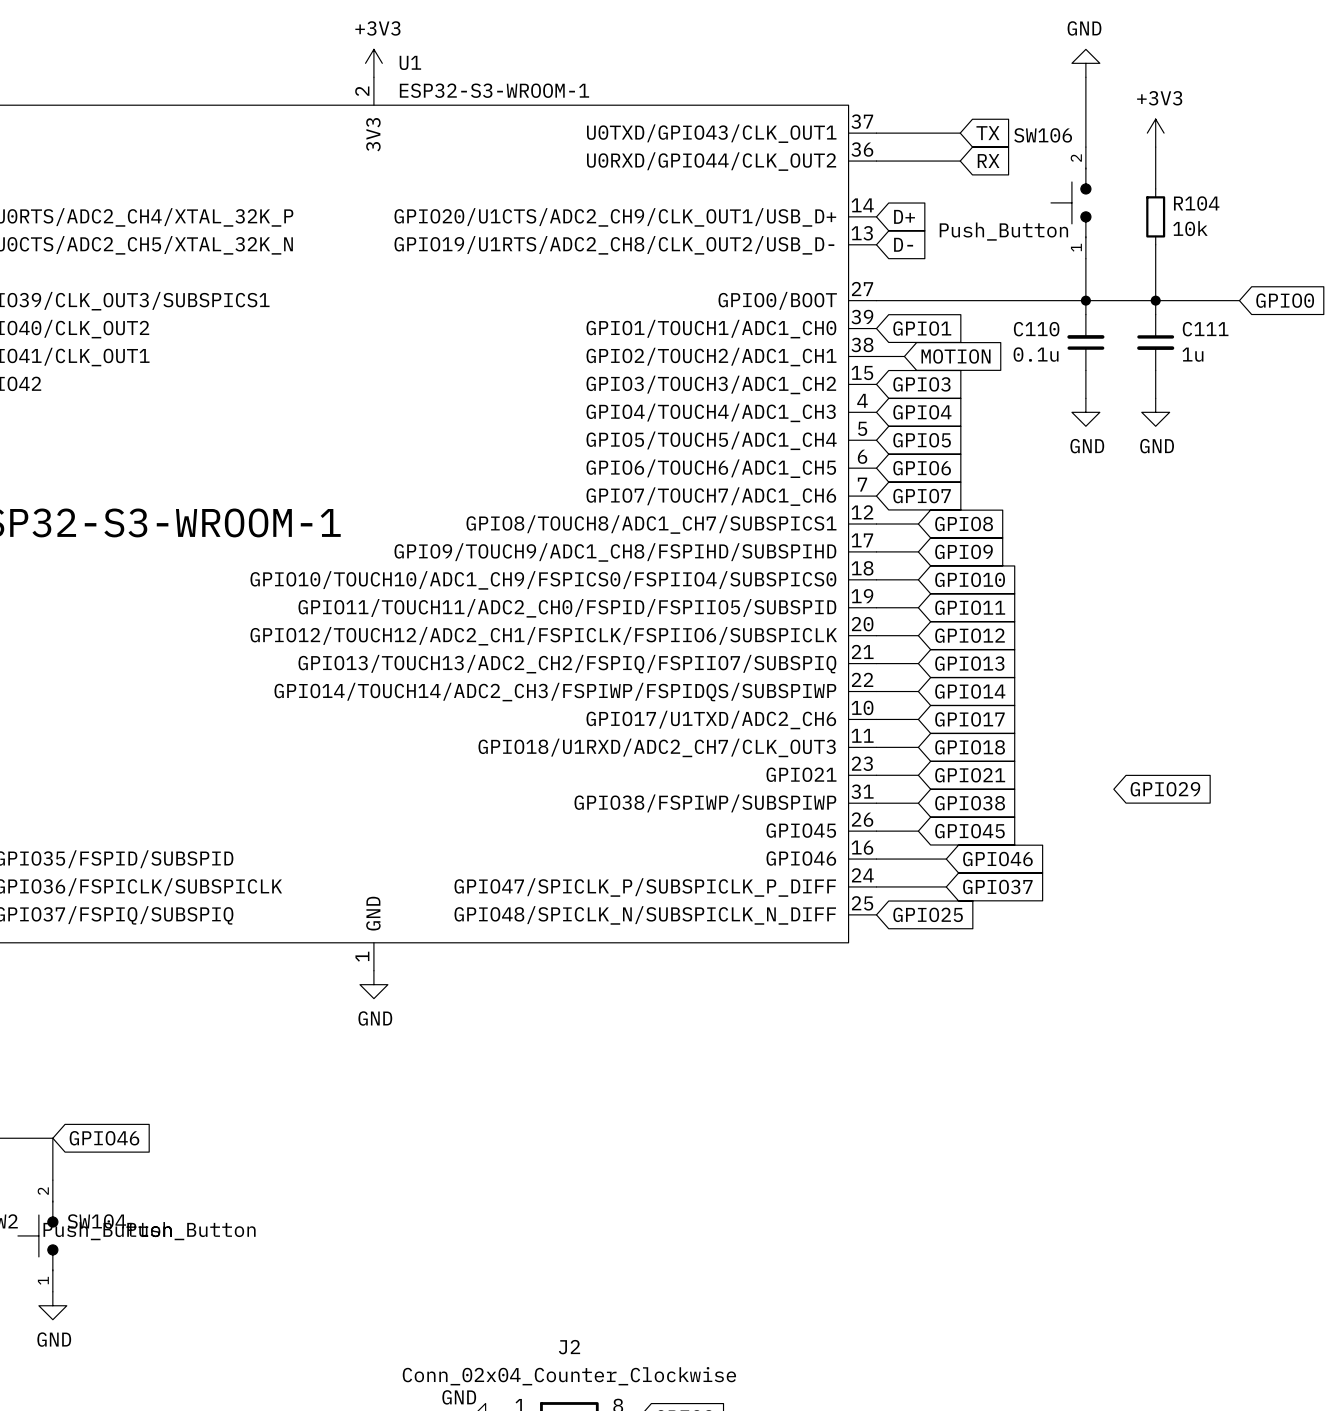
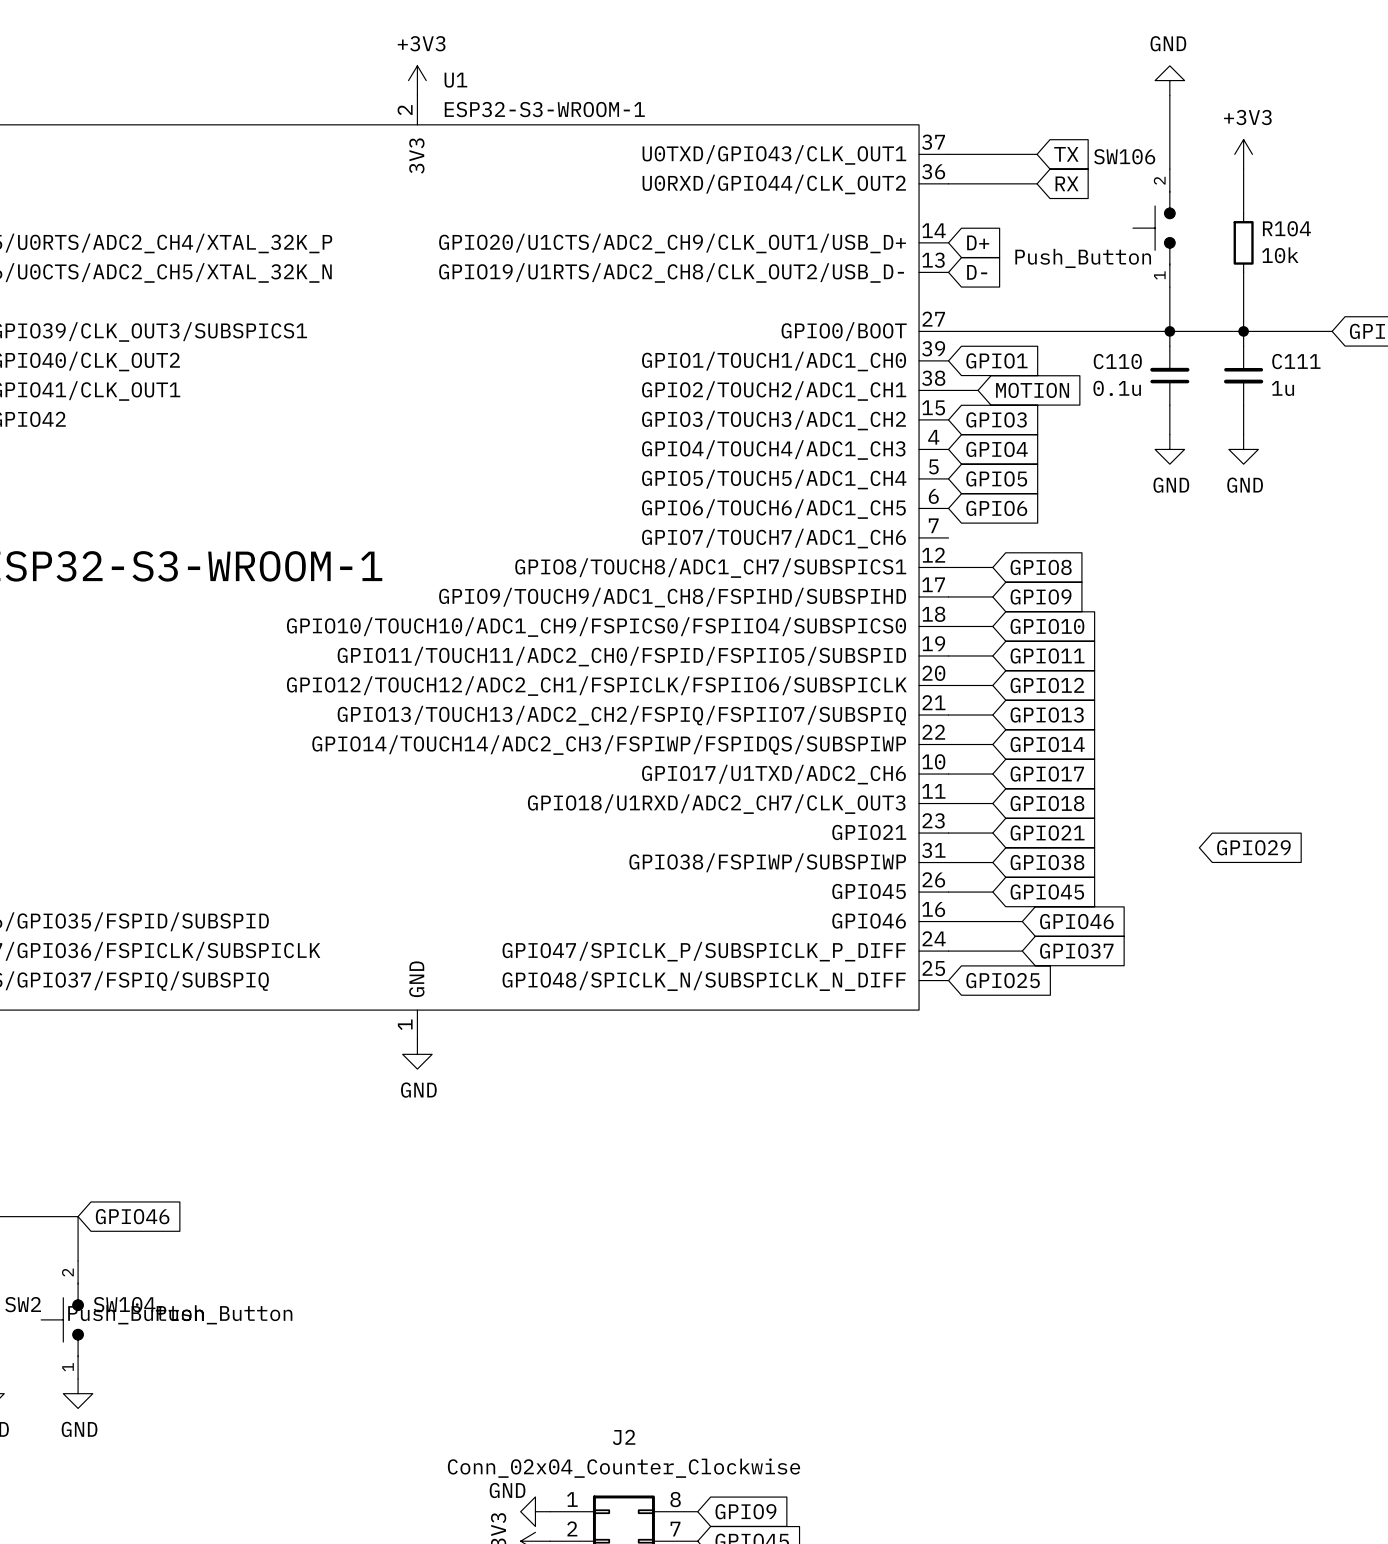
global label: GPIO7 (922, 496) -> none

